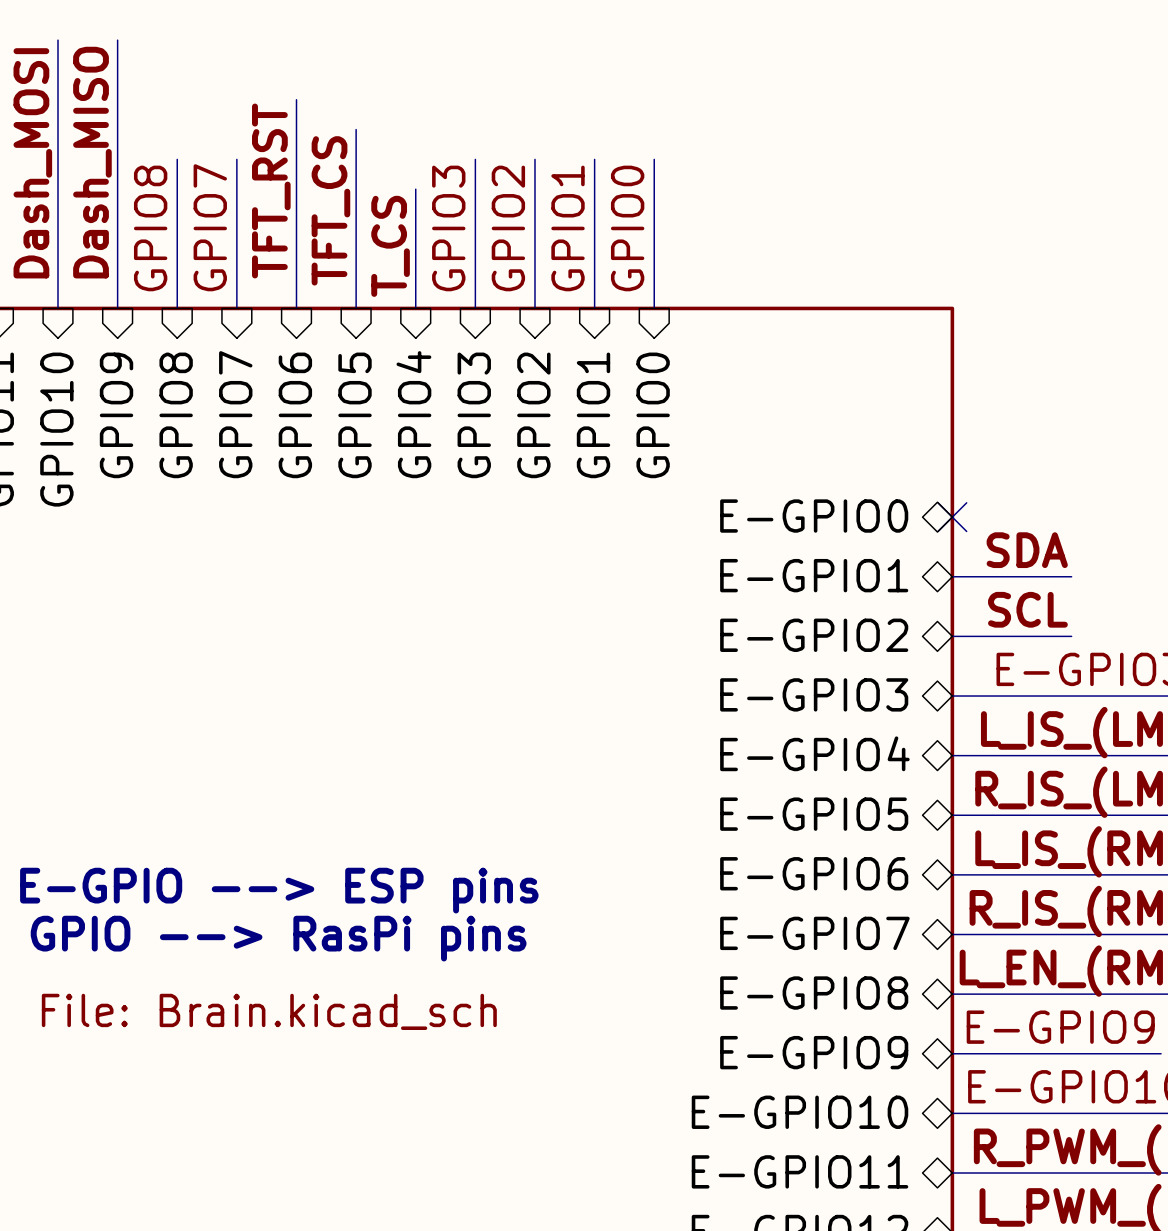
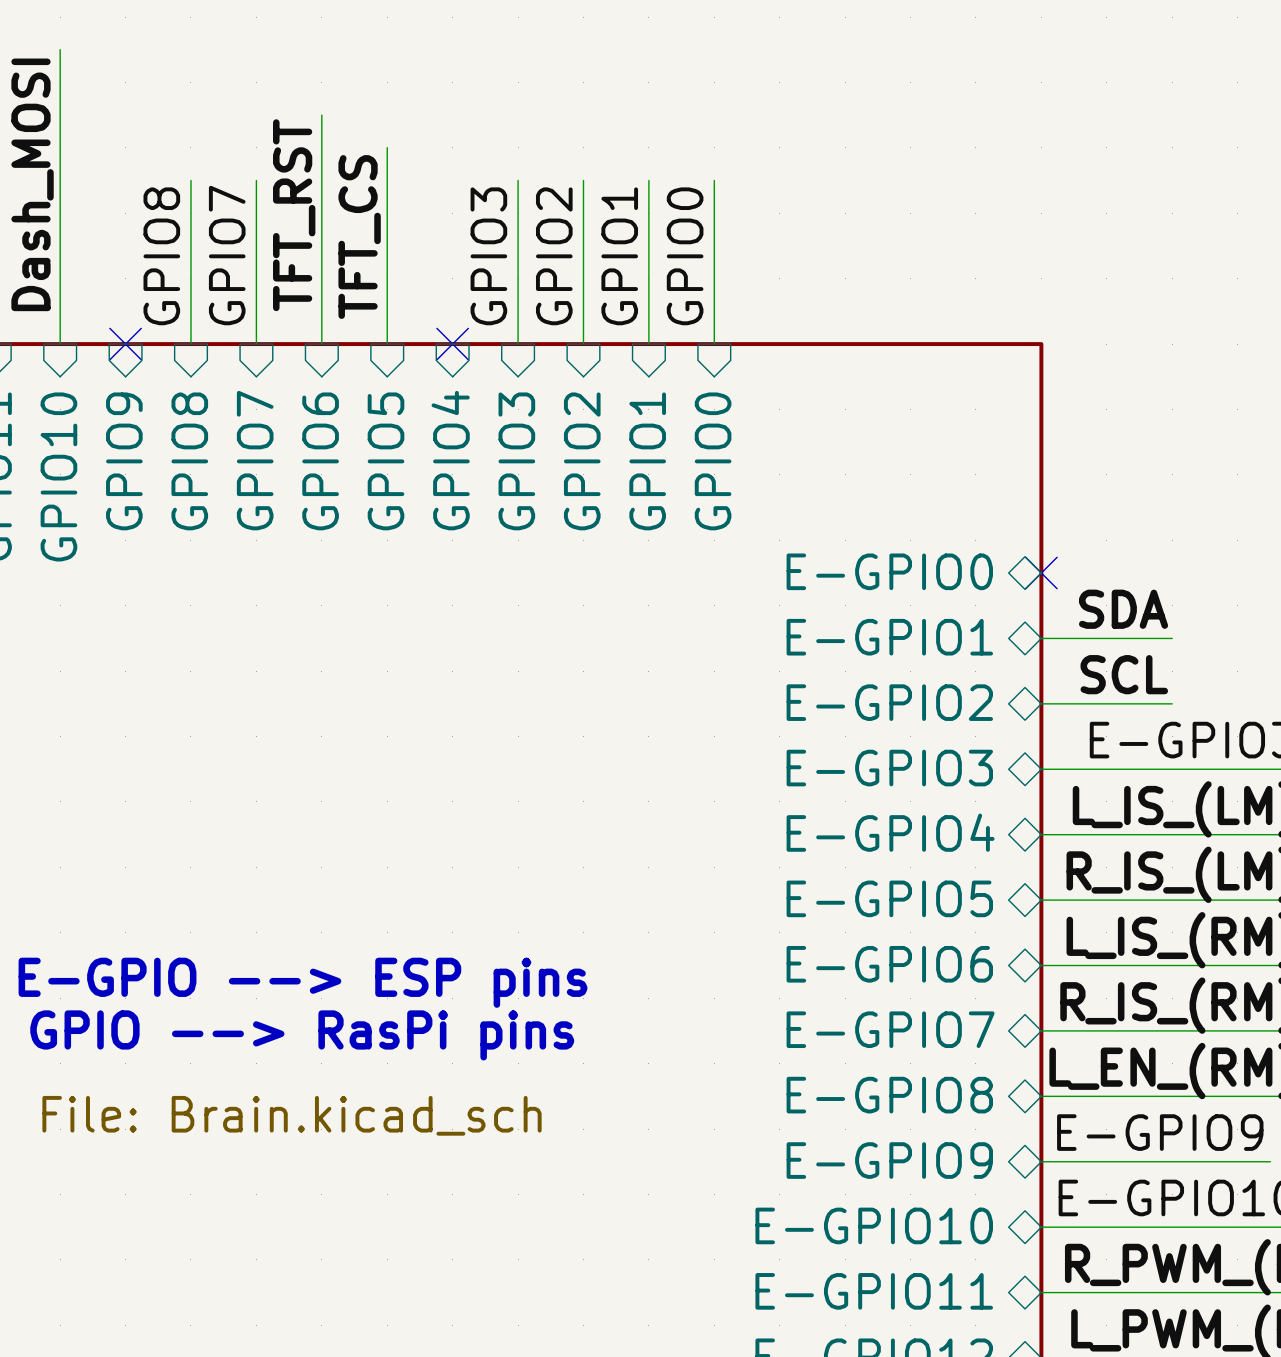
wire: (117, 40) (117, 308) -> none
label: Dash_MISO (92, 162) -> none
wire: (415, 189) (415, 308) -> none
label: T_CS (390, 246) -> none
no-connect mark: none -> (125, 344)
no-connect mark: none -> (452, 344)

